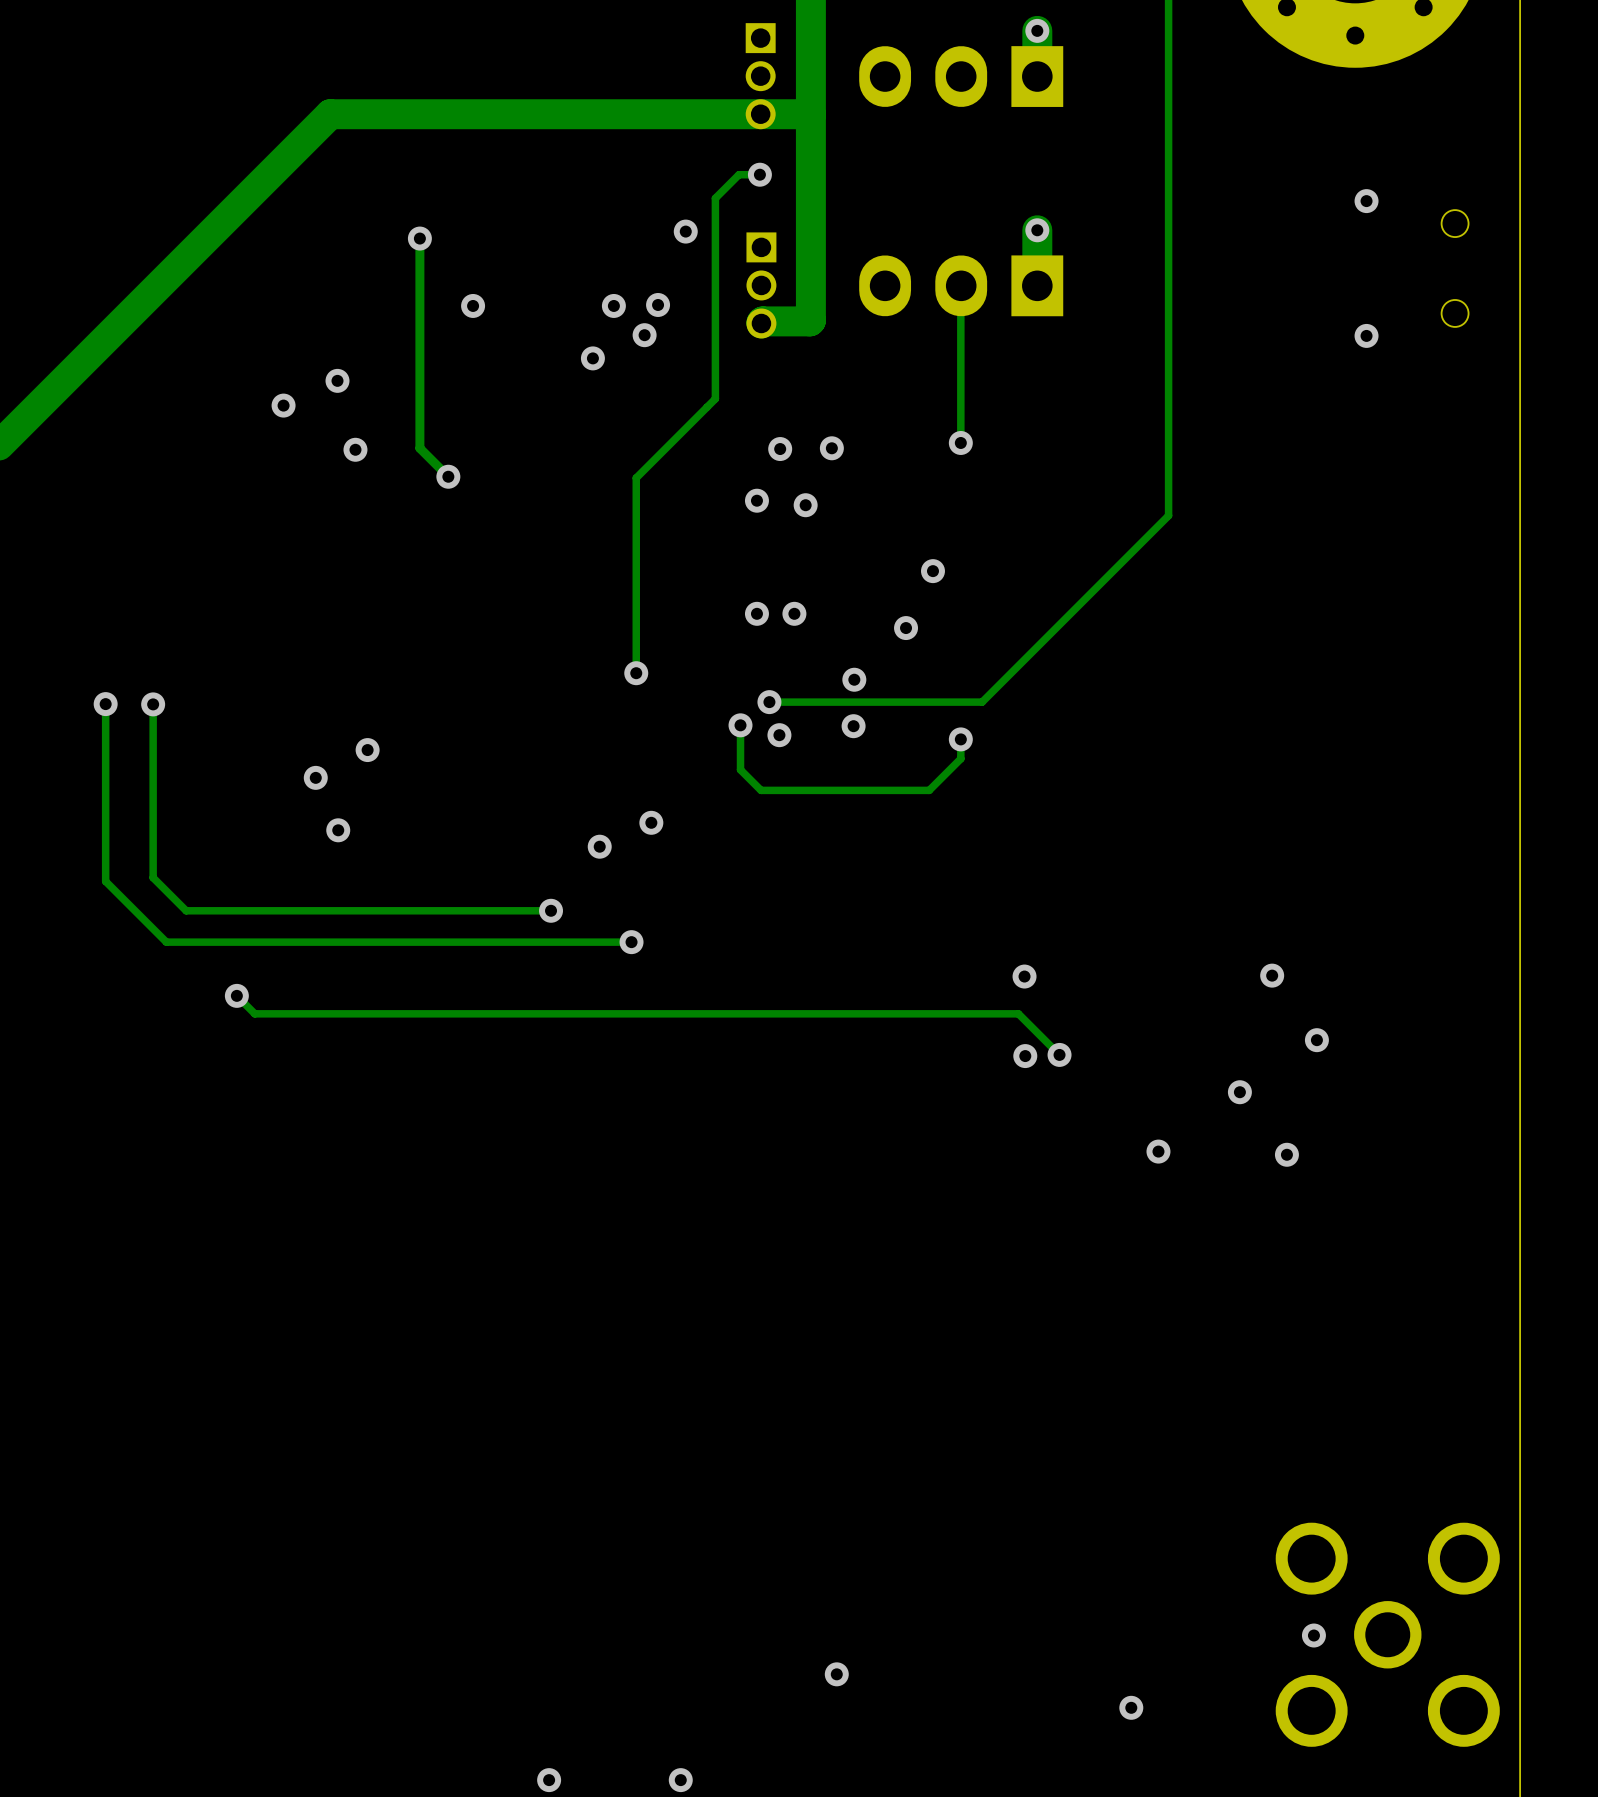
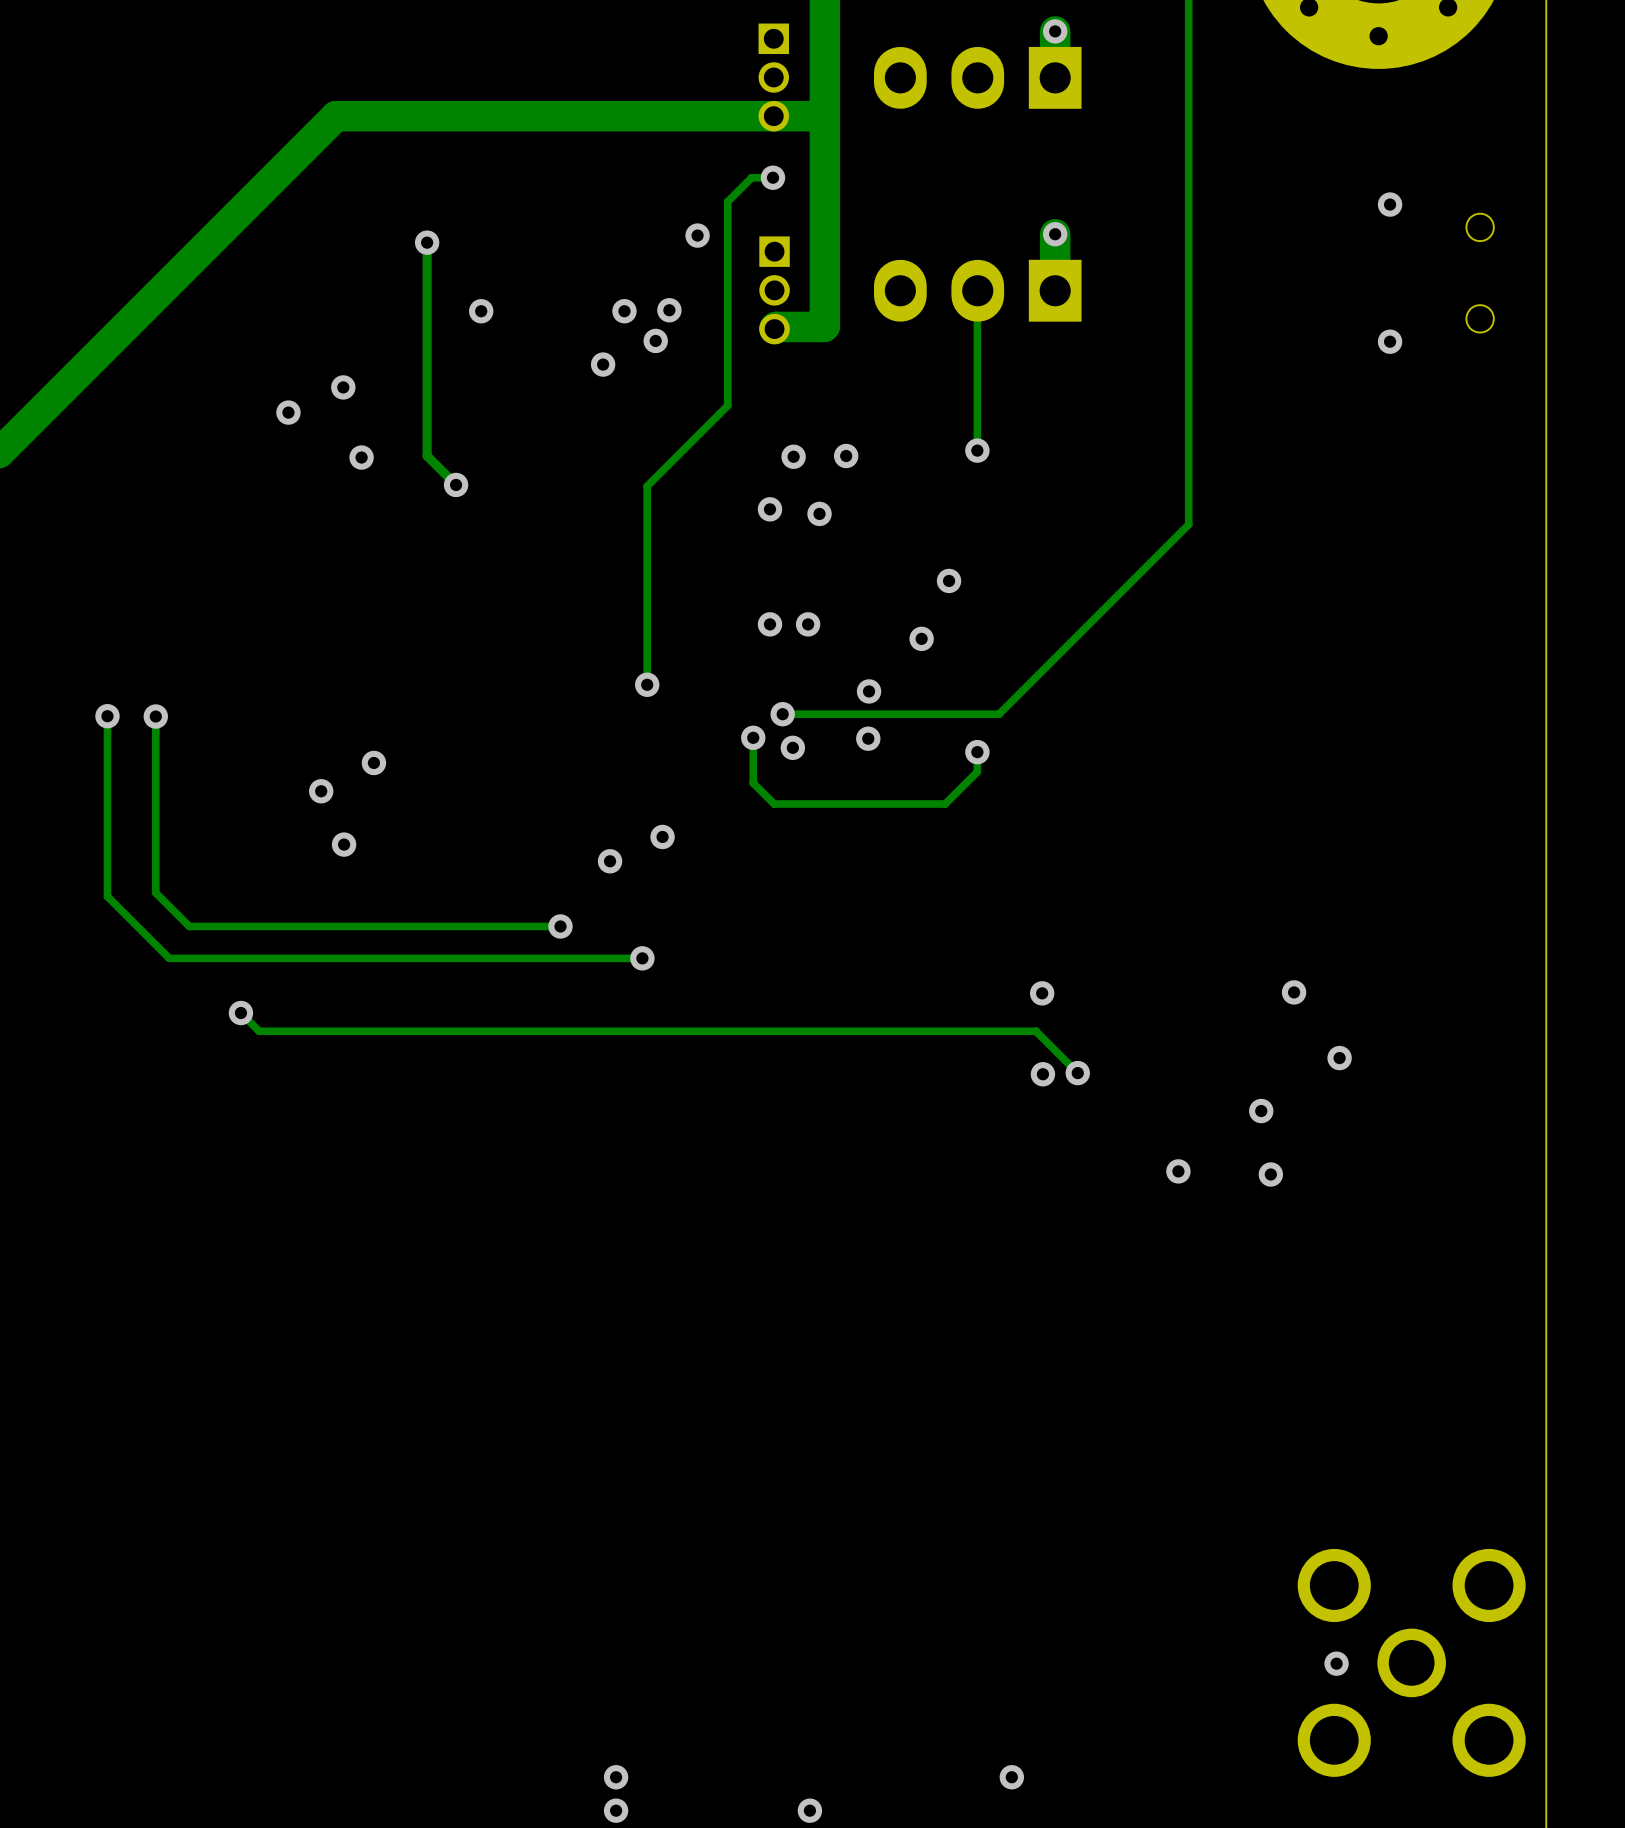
via position: (1286, 1154) -> (1270, 1174)
via: (836, 1674) -> none
via: (1131, 1707) -> none
via: none -> (616, 1777)
via: none -> (1011, 1777)
via: (549, 1780) -> none
via: none -> (616, 1810)
via: (680, 1780) -> none
via: none -> (809, 1810)

